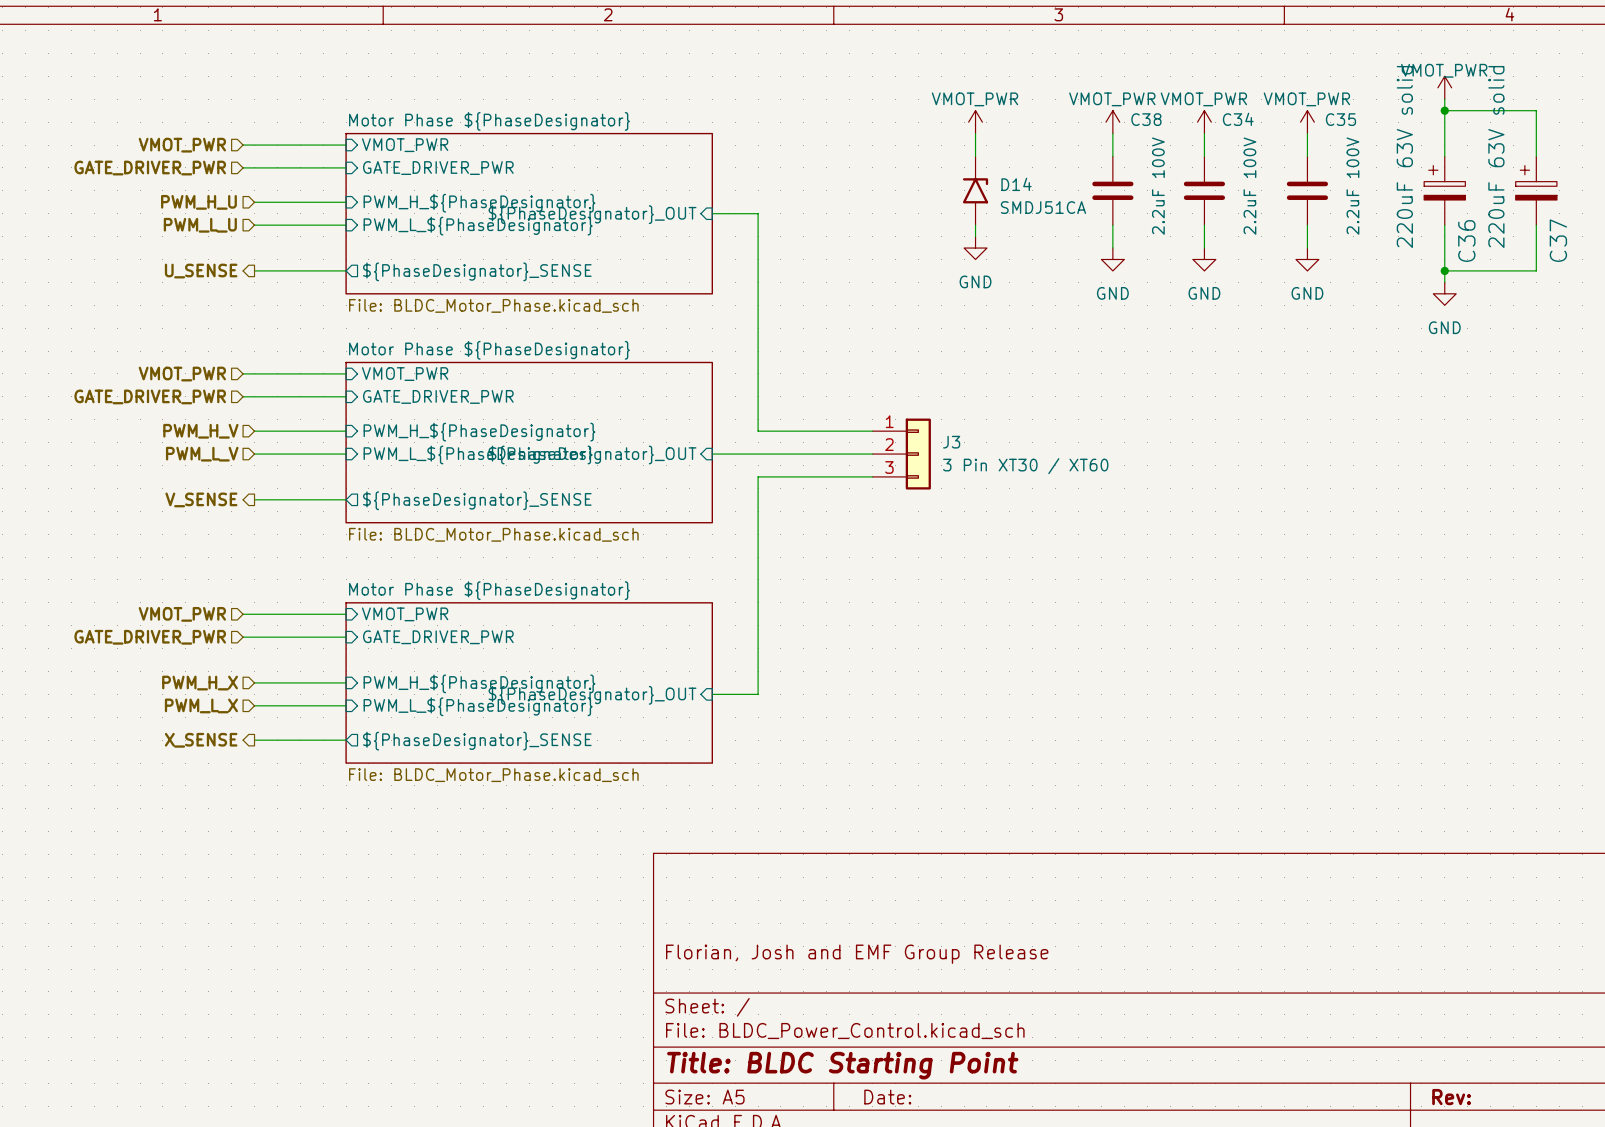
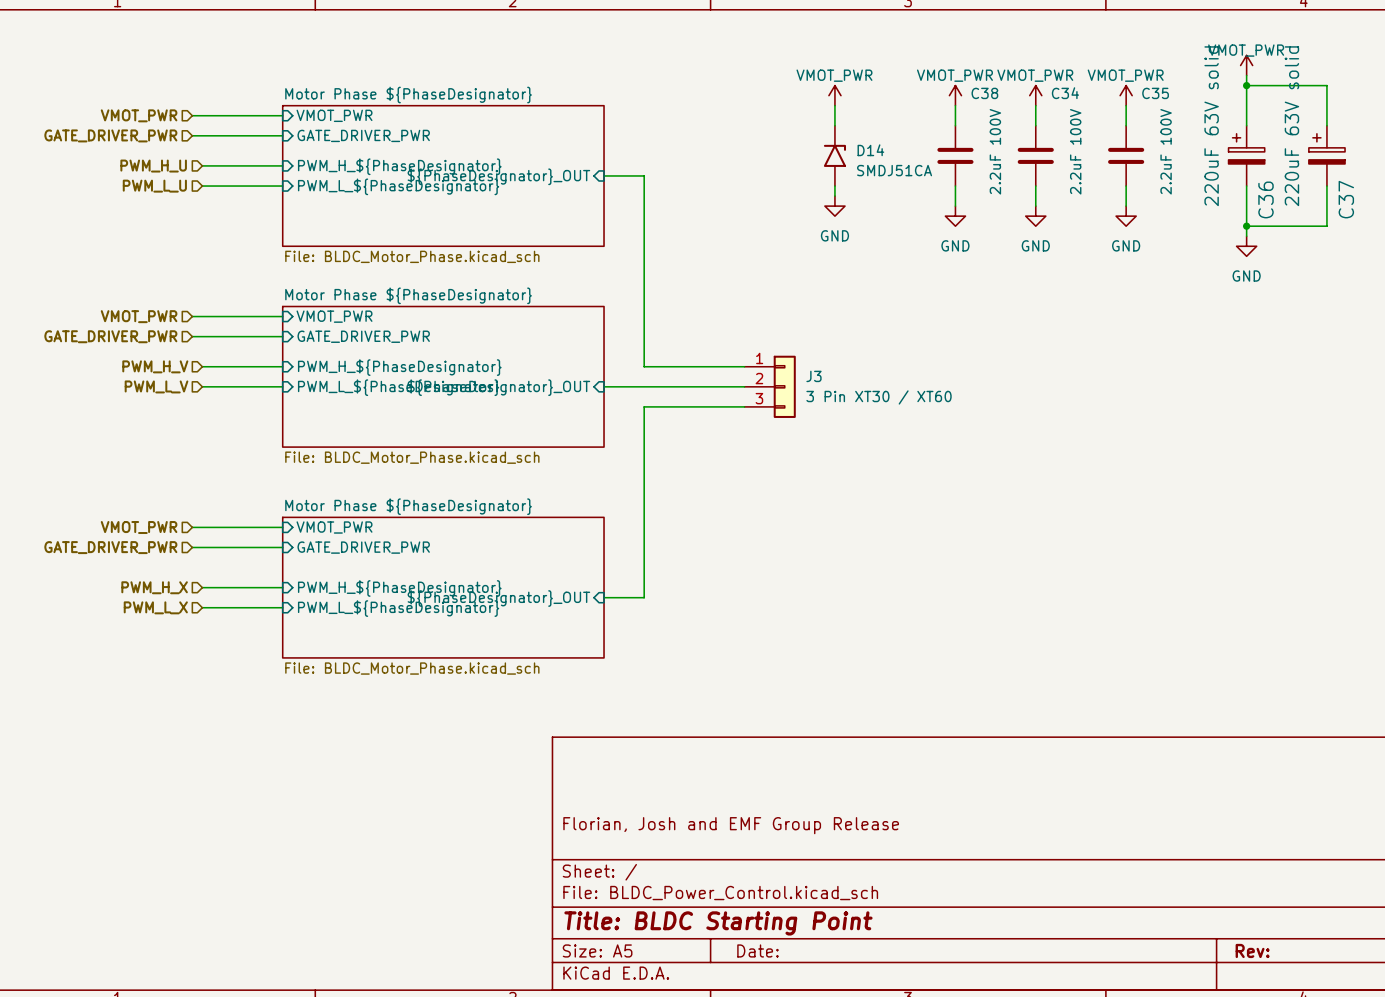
wire: (254, 270) (346, 270) -> none
hierarchical label: U_SENSE (201, 271) -> none
sheet pin: ${PhaseDesignator}_SENSE (477, 271) -> none
hierarchical label: V_SENSE (201, 499) -> none
wire: (254, 499) (346, 499) -> none
sheet pin: ${PhaseDesignator}_SENSE (477, 500) -> none
hierarchical label: X_SENSE (201, 740) -> none
wire: (254, 740) (346, 740) -> none
sheet pin: ${PhaseDesignator}_SENSE (477, 741) -> none

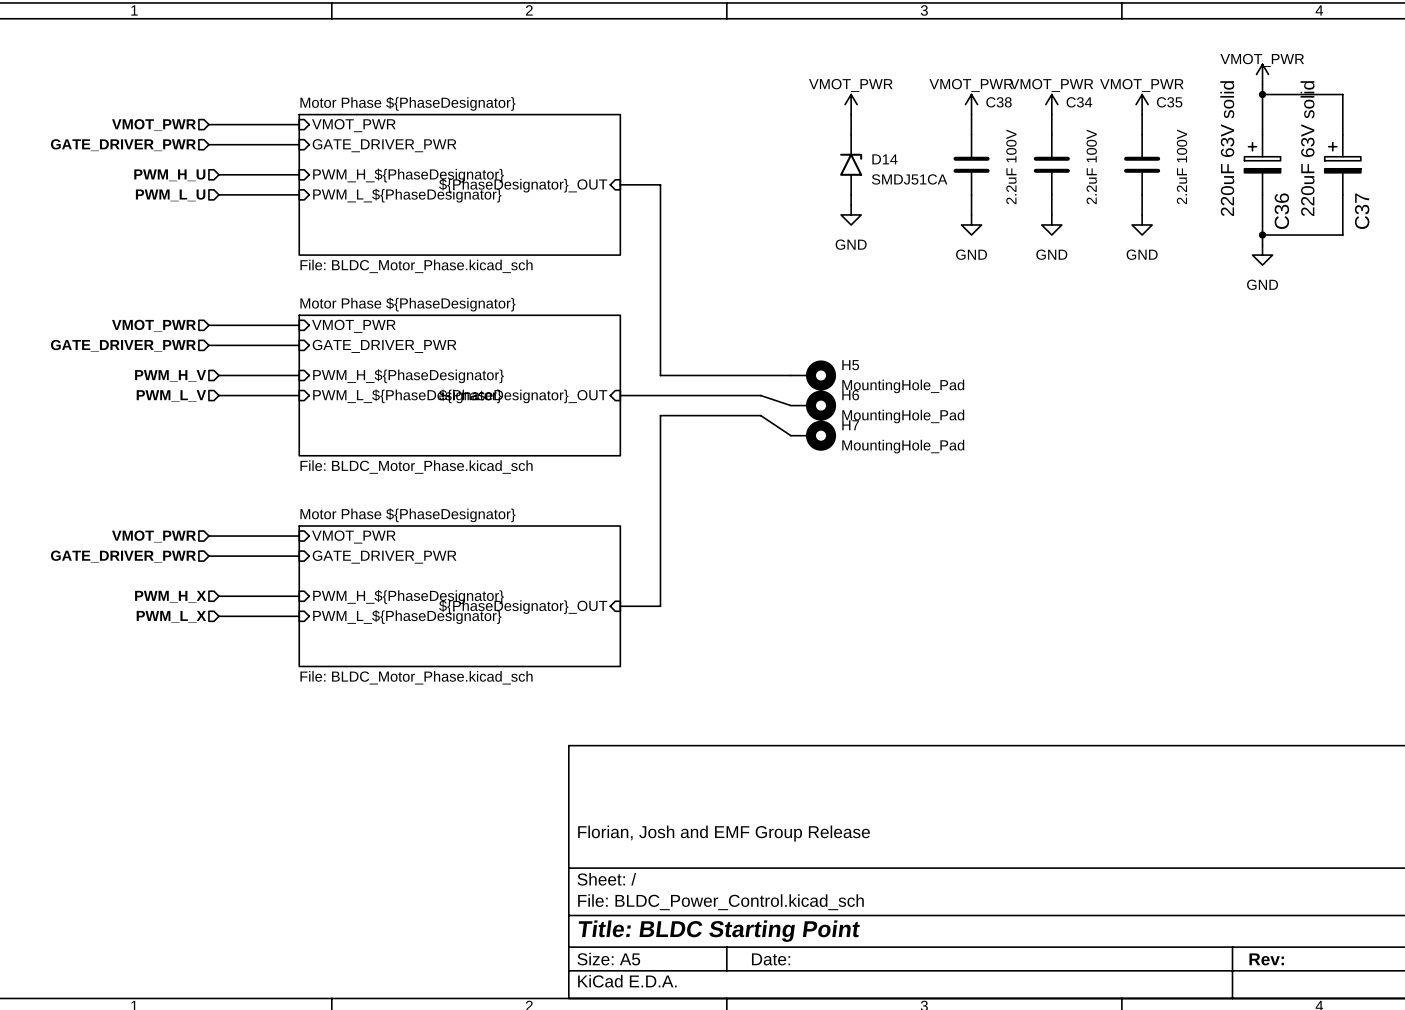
H5: none -> MountingHole_Pad (813, 375)
wire: none -> (760, 395) (790, 405)
J3: 3 Pin XT30 / XT60 (770, 386) -> none
H6: none -> MountingHole_Pad (813, 405)
wire: none -> (760, 415) (790, 435)
H7: none -> MountingHole_Pad (813, 435)

